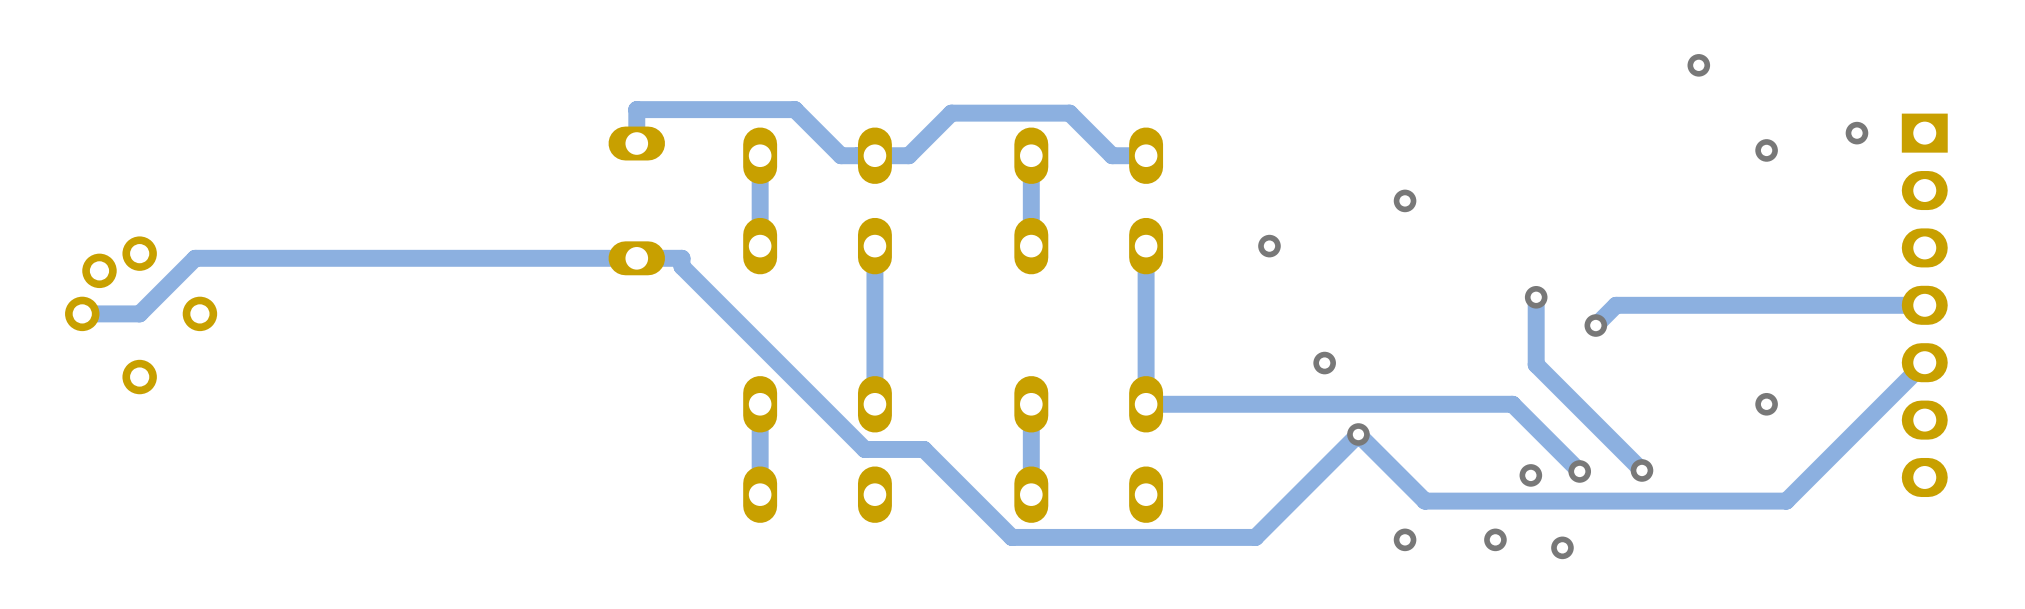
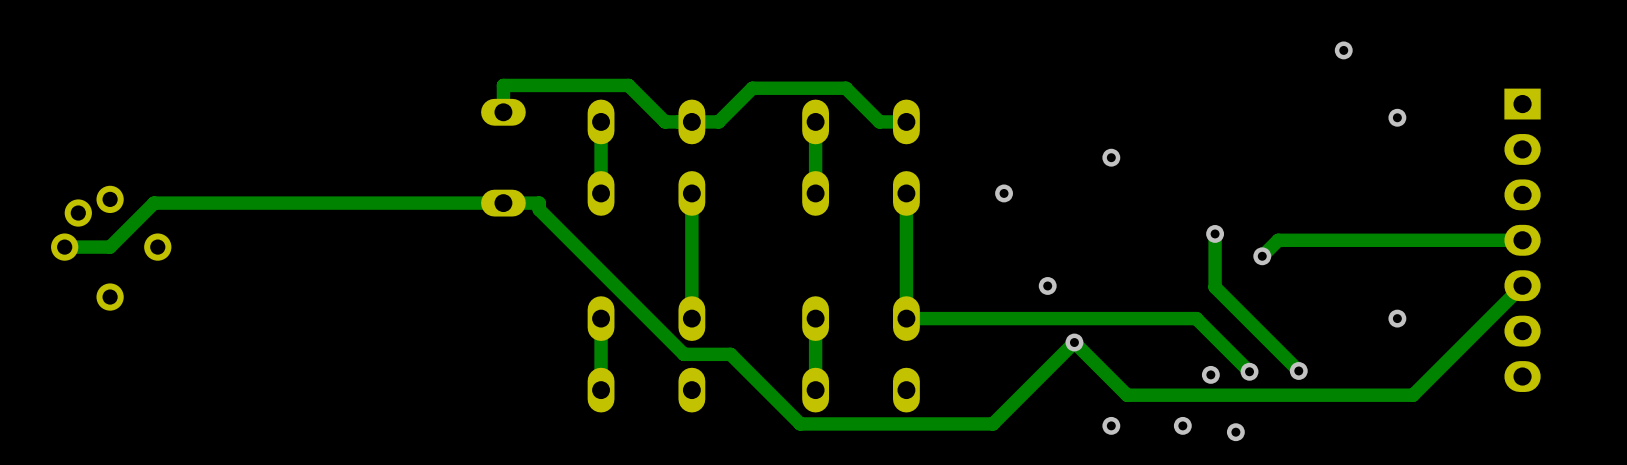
via: (1856, 133) -> none

